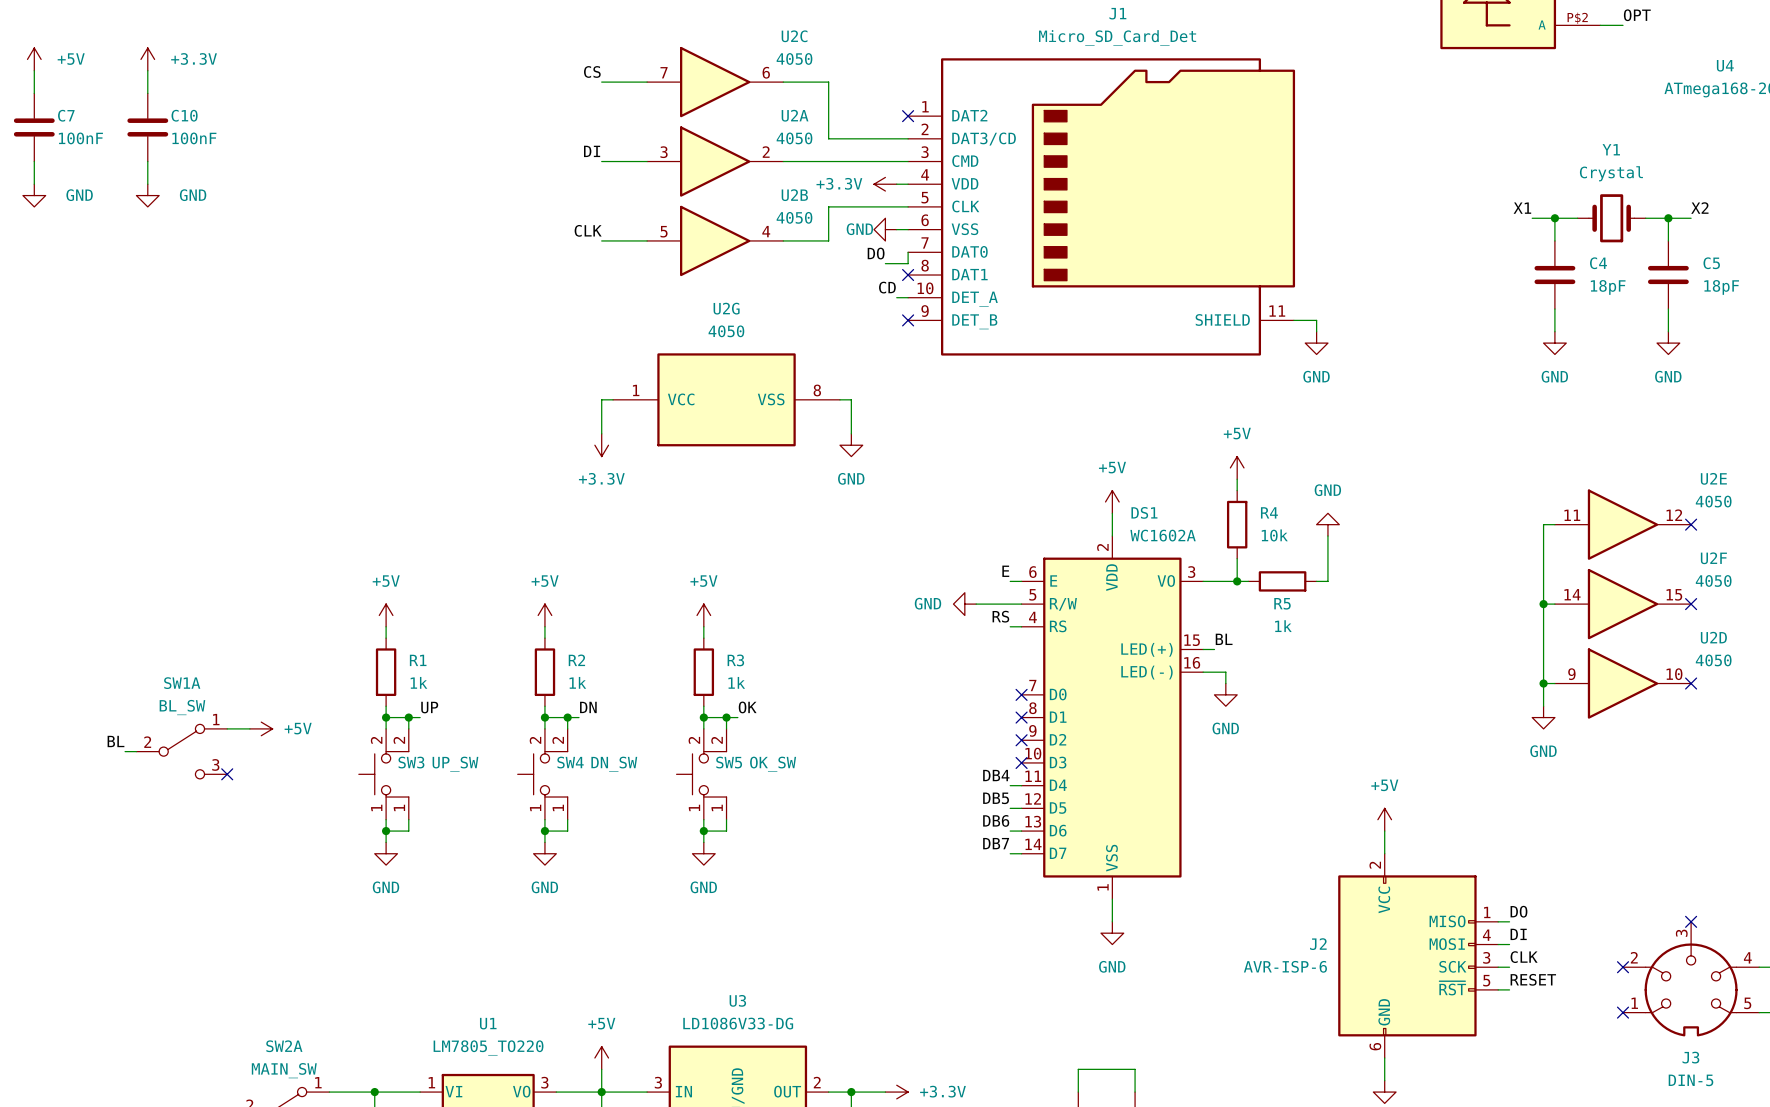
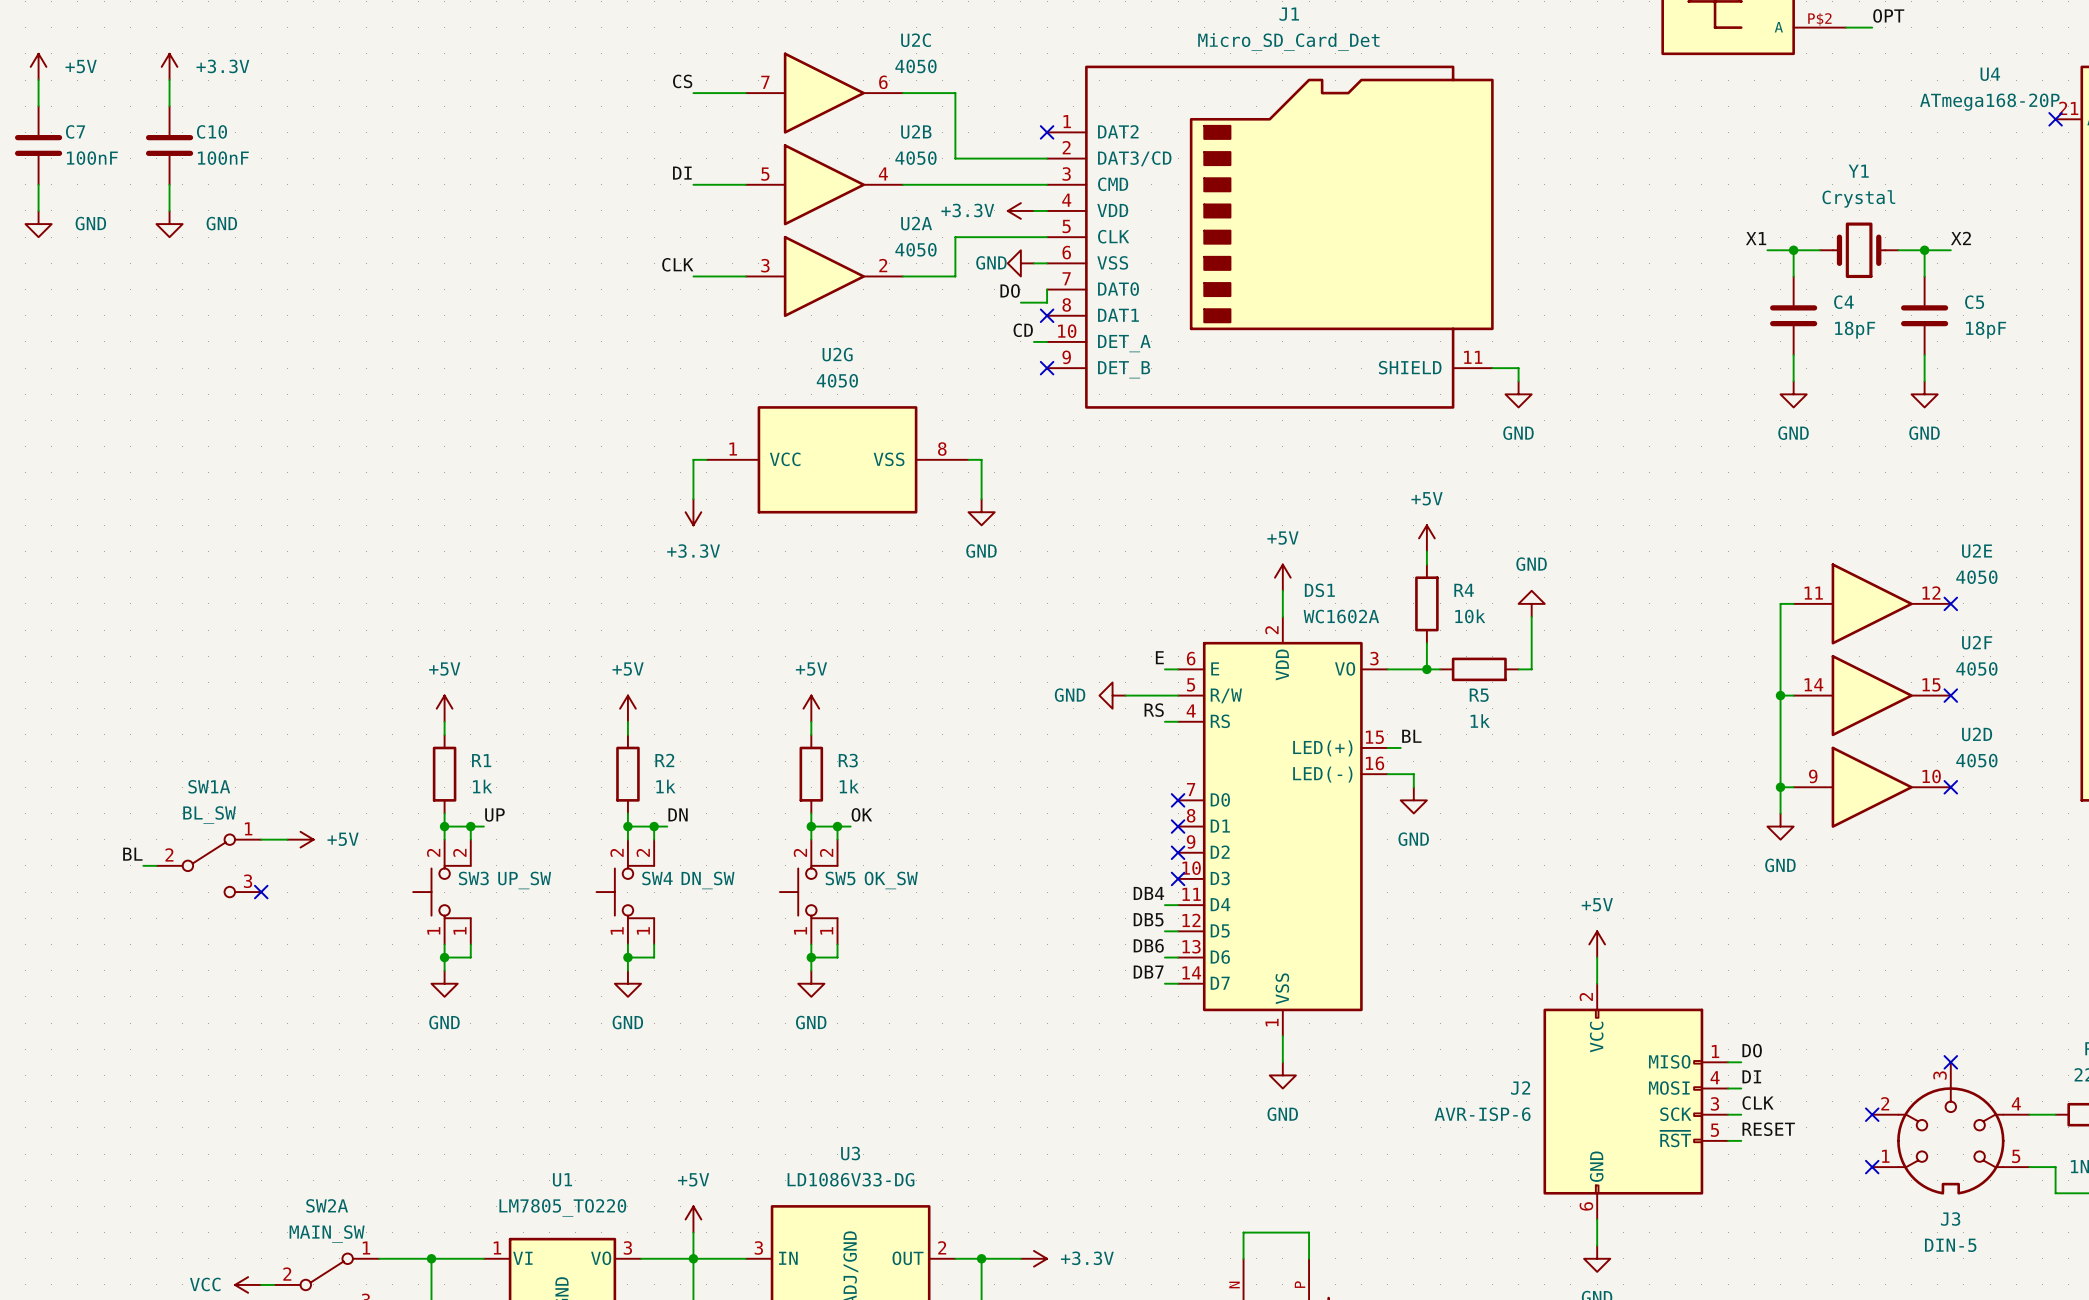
U2A position: (715, 161) -> (824, 276)
U2B position: (715, 240) -> (824, 184)

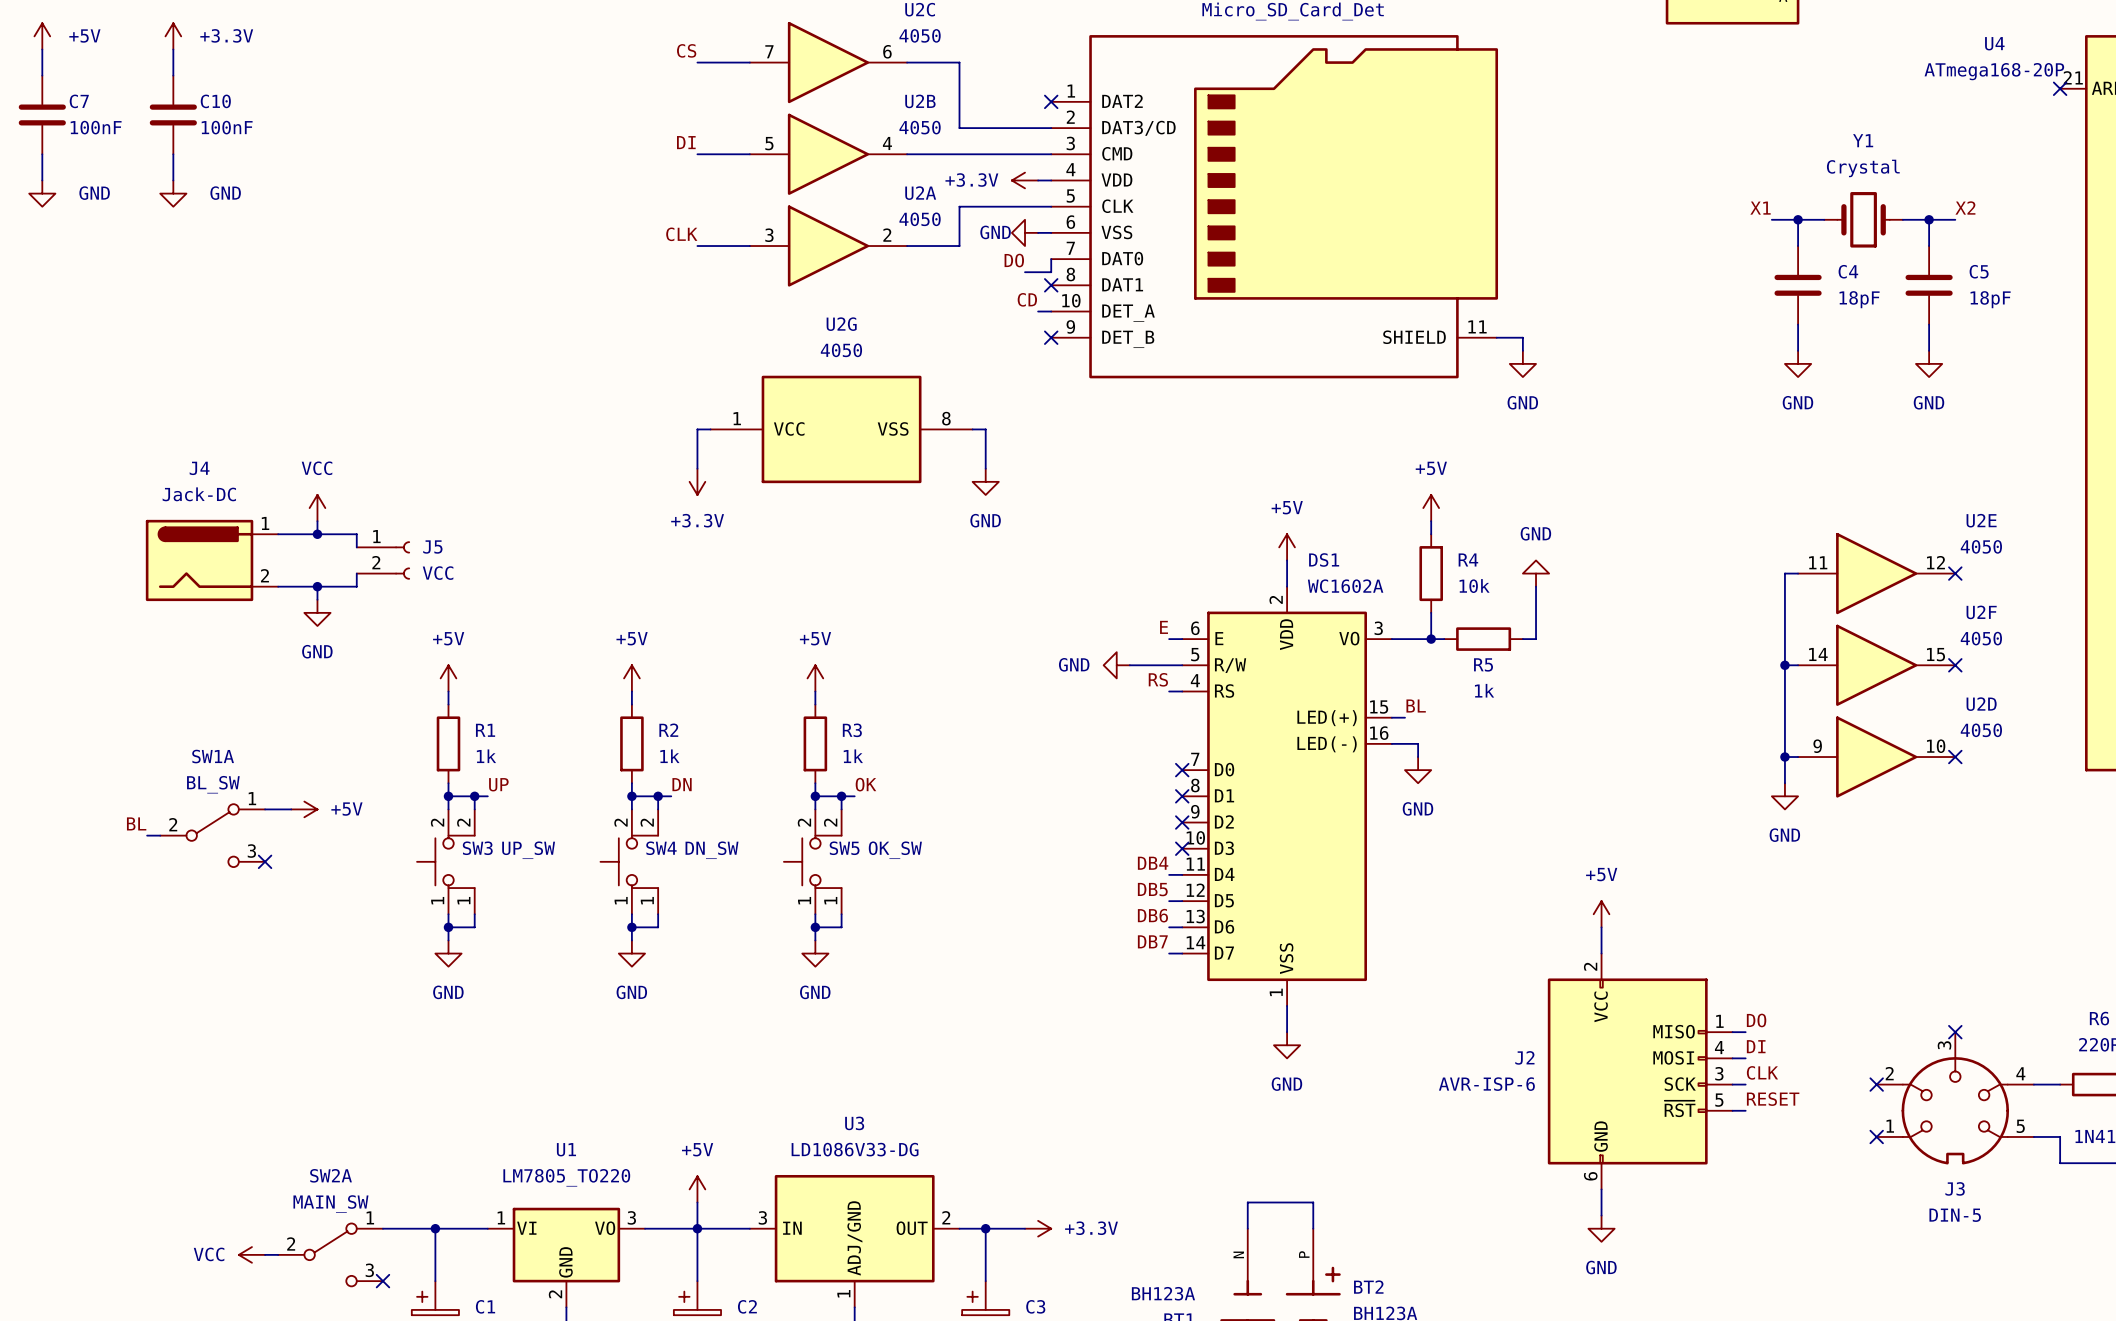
power symbol: none -> VCC (317, 508)
wire: none -> (317, 521) (317, 534)
wire: none -> (278, 534) (356, 534) (356, 547)
junction: none -> (317, 534)
J4: none -> Jack-DC (211, 560)
J5: none -> VCC (383, 560)
wire: none -> (356, 573) (356, 586) (278, 586)
wire: none -> (317, 586) (317, 599)
junction: none -> (317, 586)
power symbol: none -> GND (317, 612)

